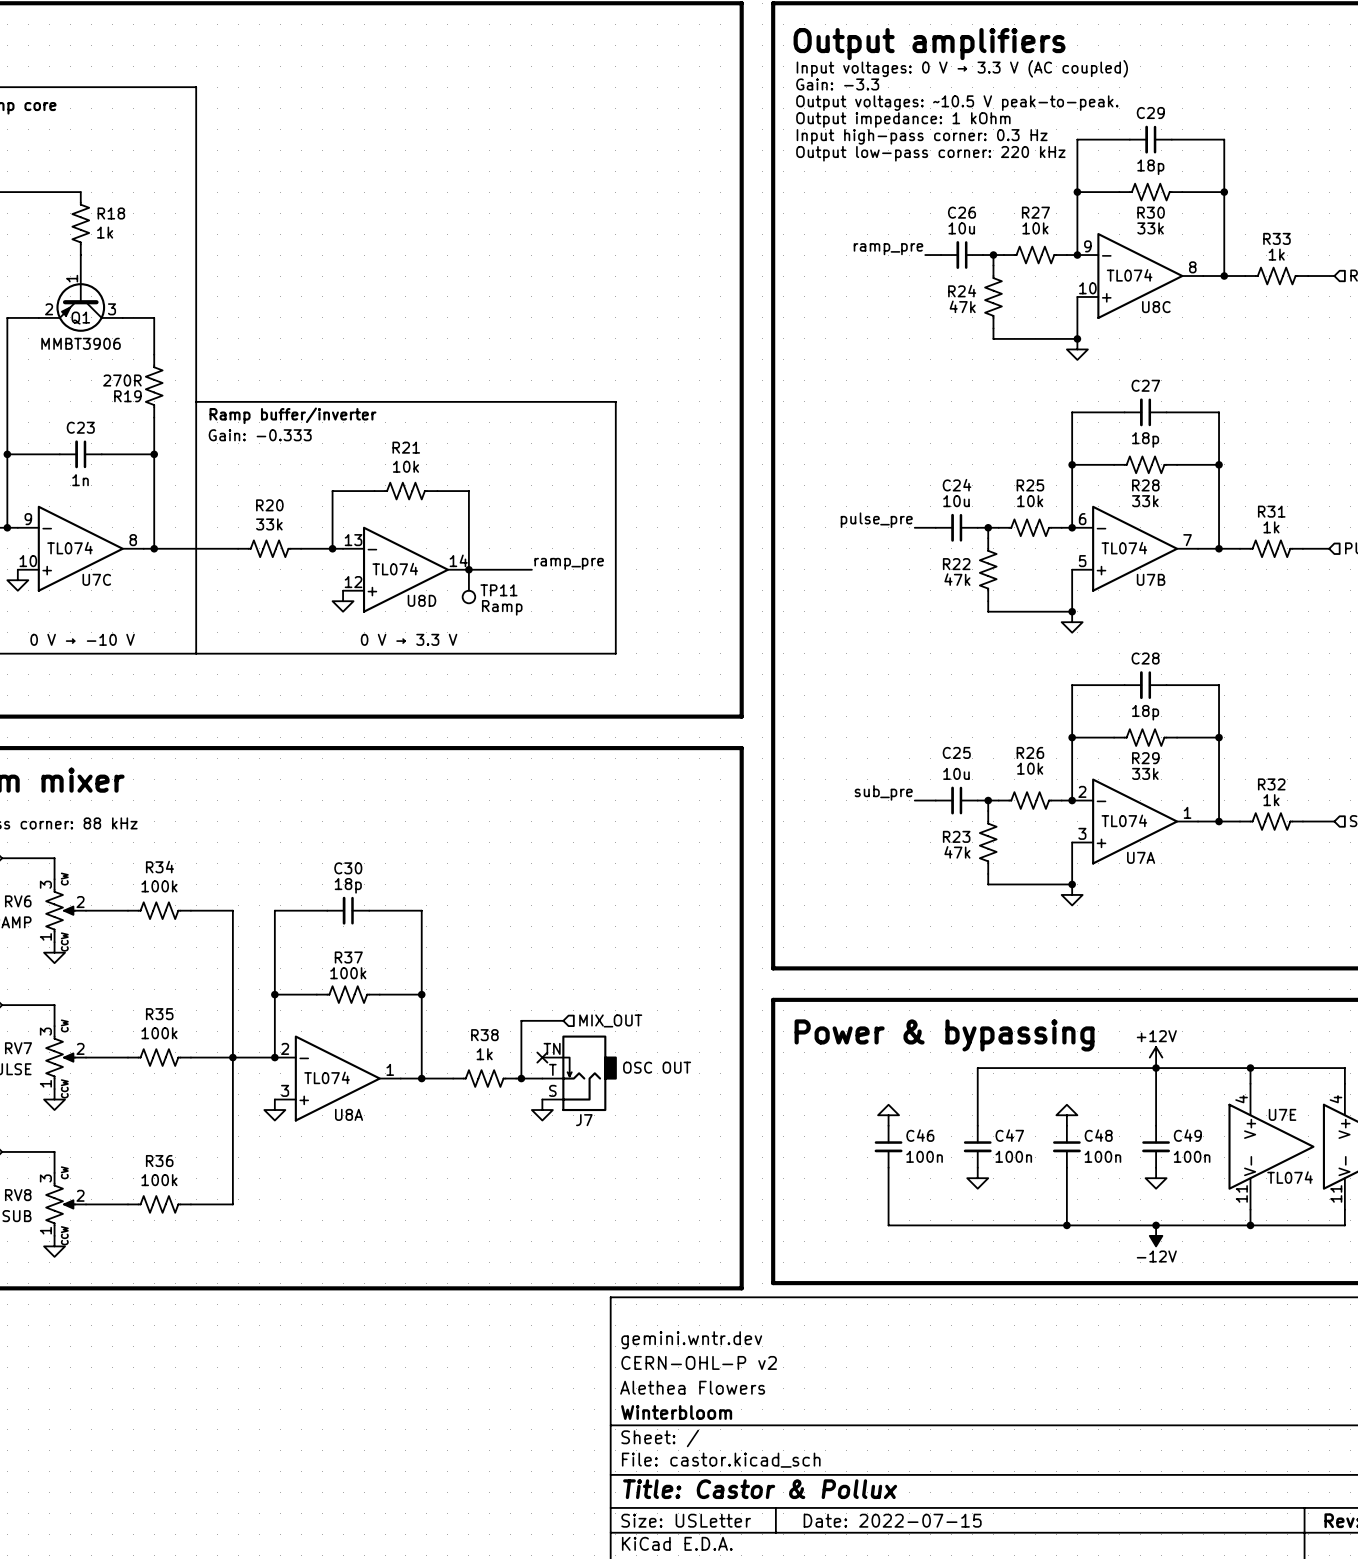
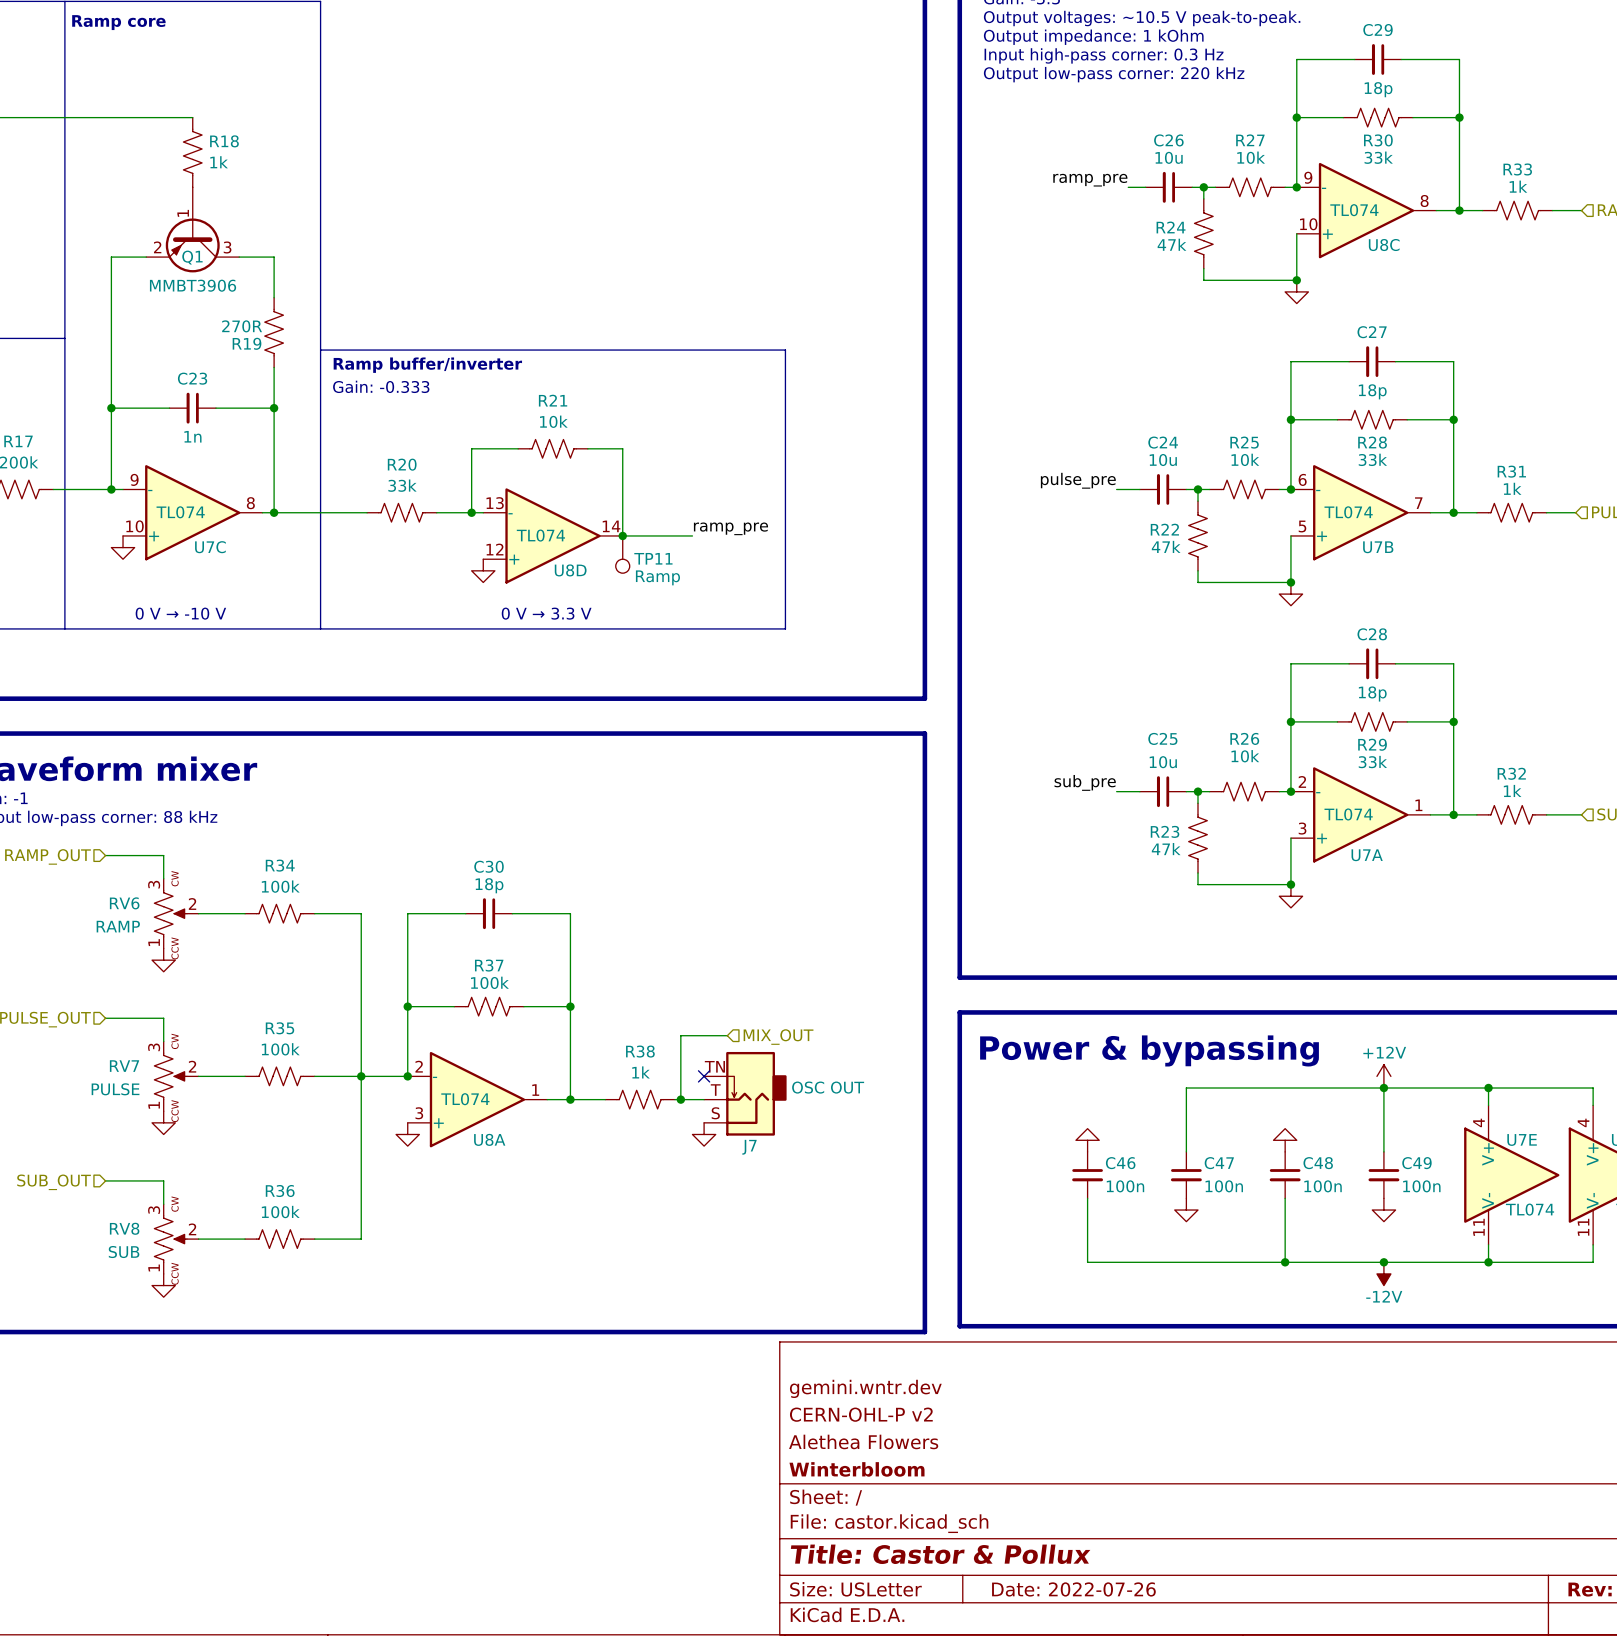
title block: Date: 2022-07-15 (892, 1520) -> Date: 2022-07-26 (1073, 1589)

